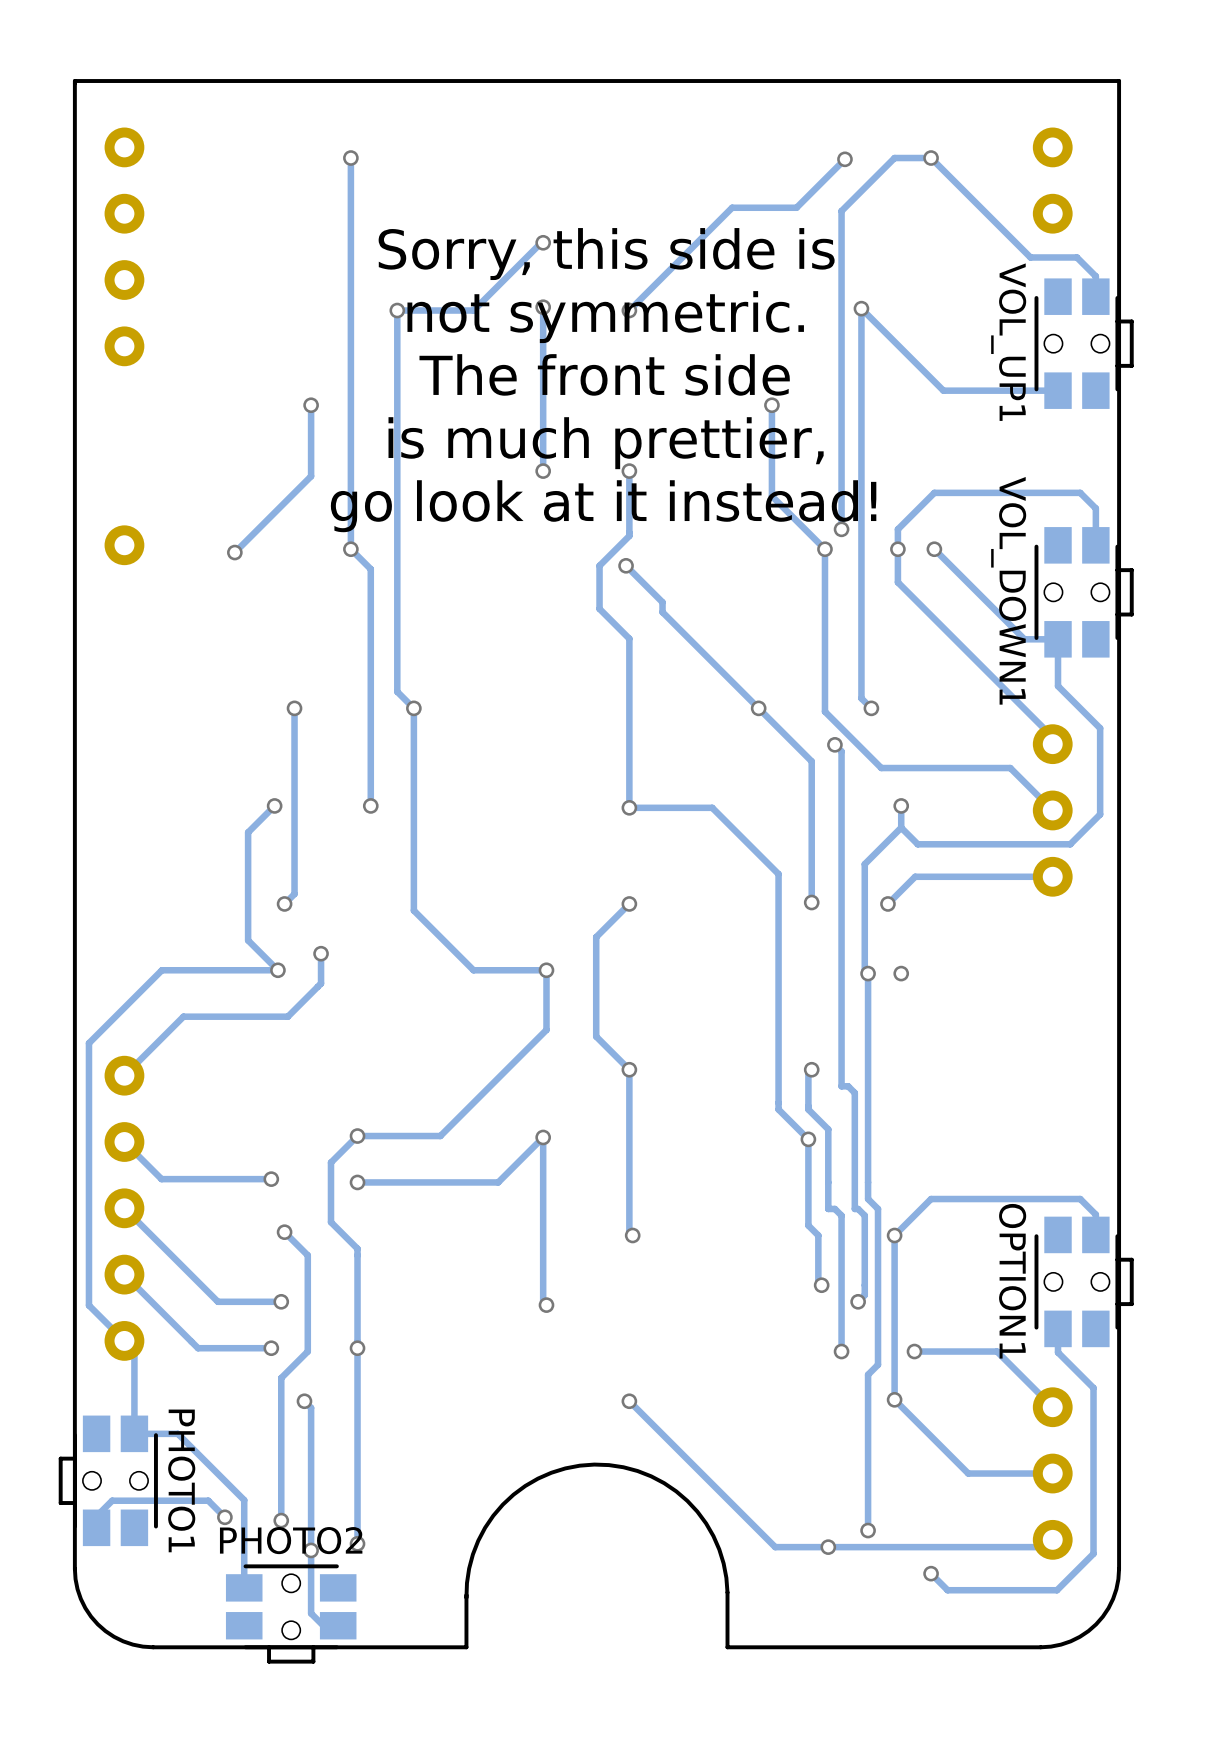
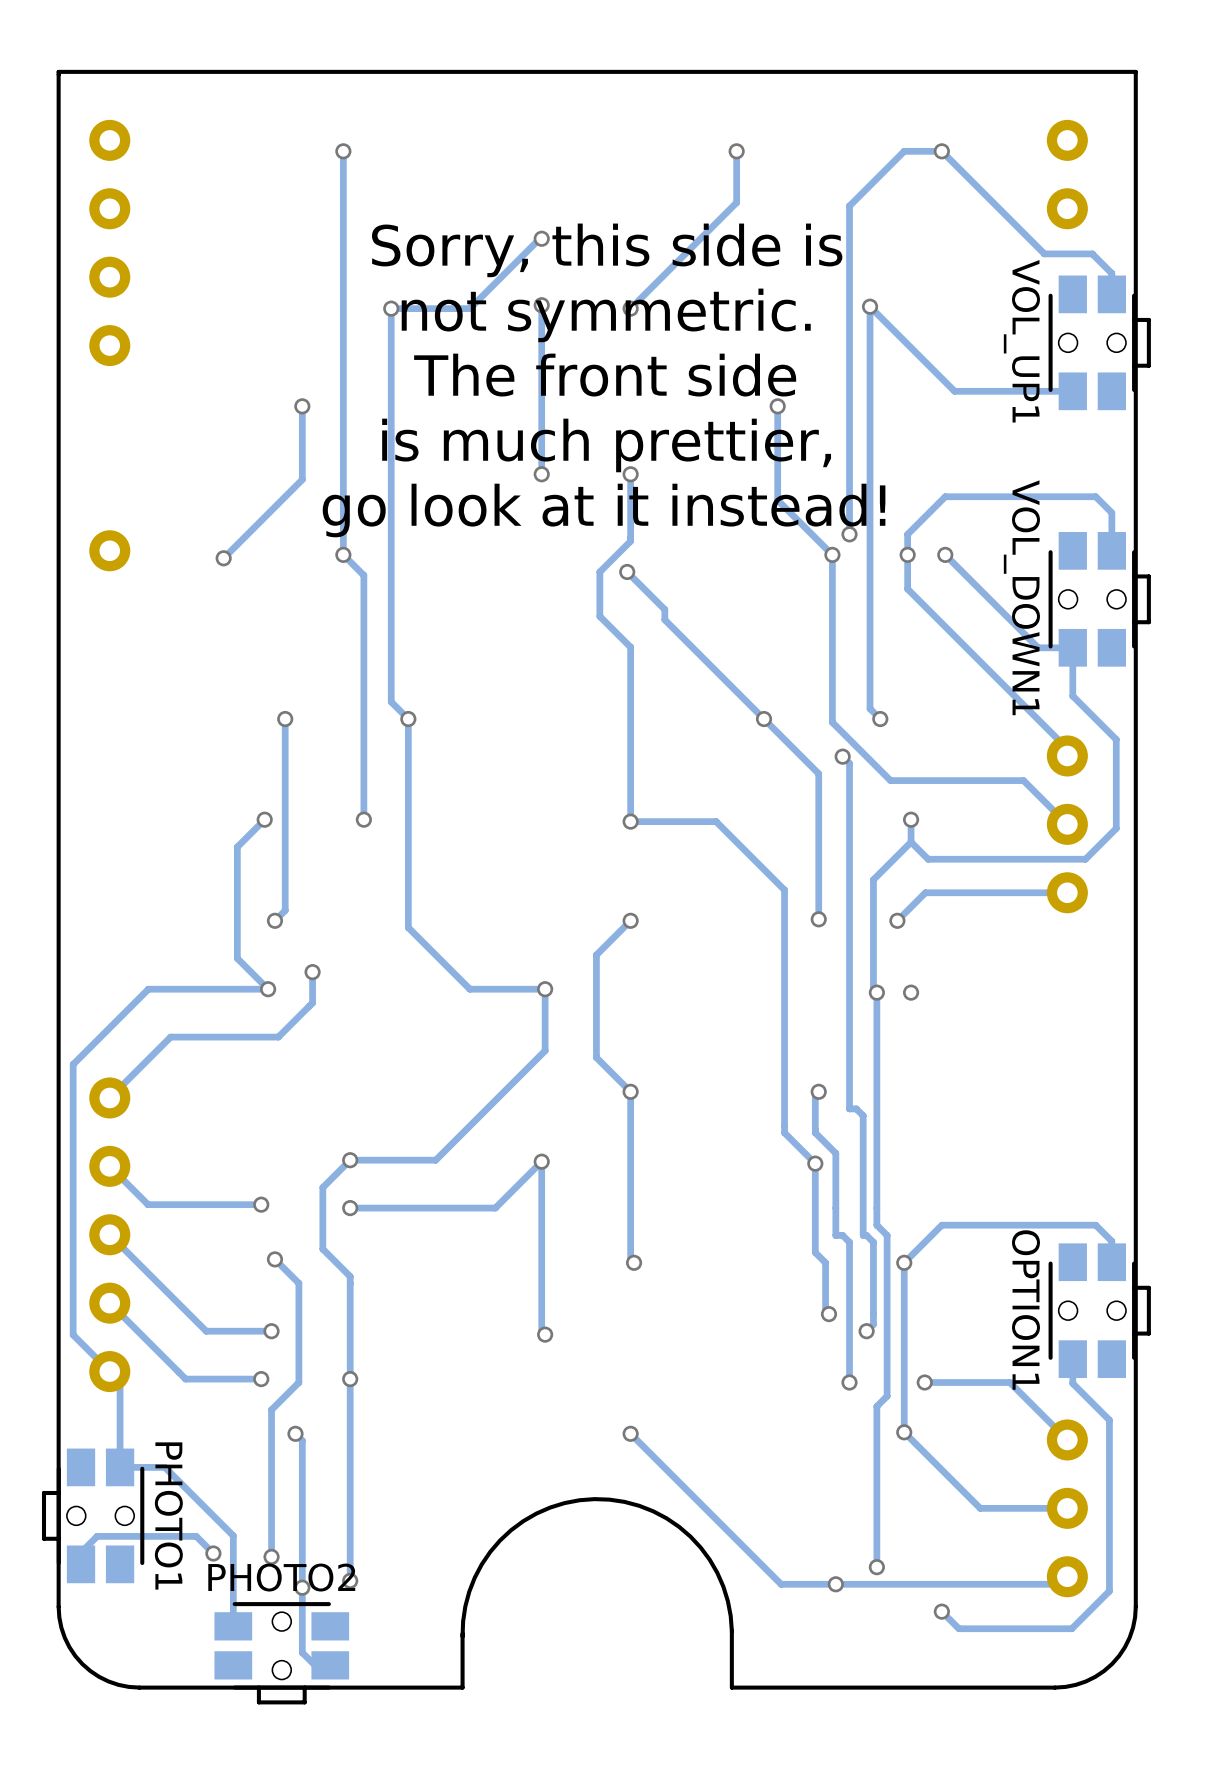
track: (844, 159) (796, 207) (732, 207) -> (736, 151) (736, 202)
via position: (844, 159) -> (736, 151)

